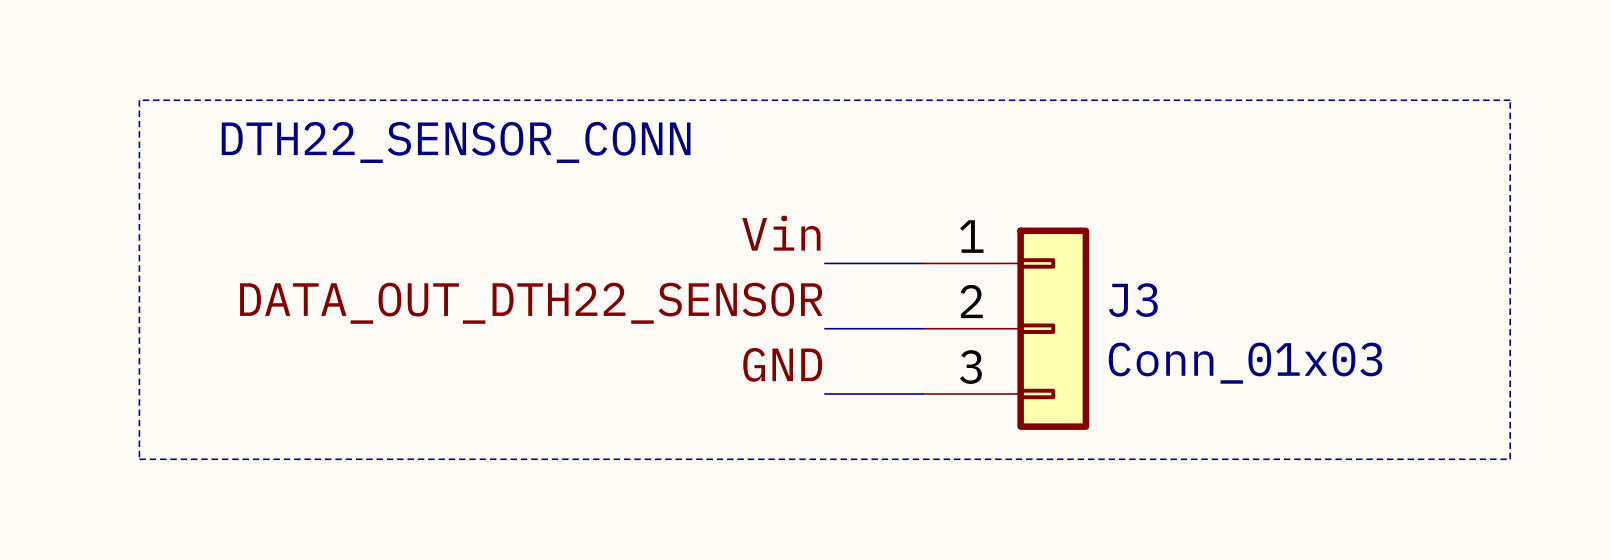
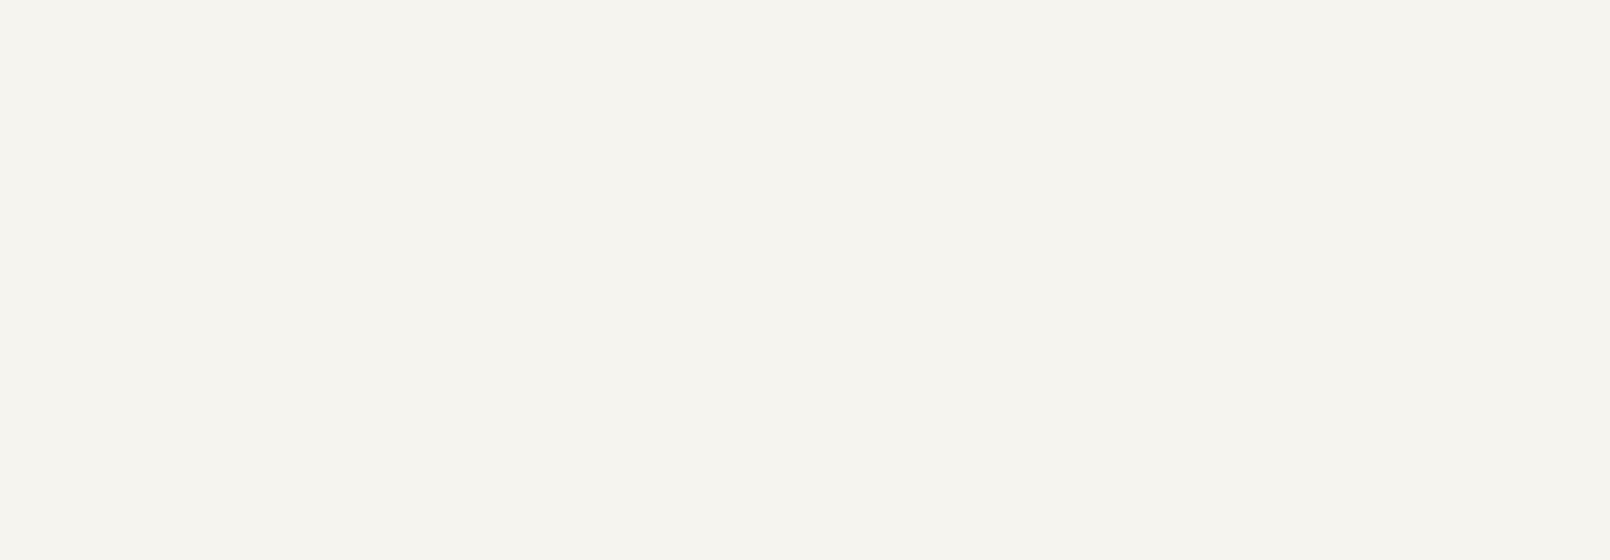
line: (139, 100) (139, 459) (1510, 459) (1510, 100) (139, 100) -> none
text: DTH22_SENSOR_CONN (456, 142) -> none
label: Vin (781, 233) -> none
wire: (824, 263) (922, 263) -> none
label: DATA_OUT_DTH22_SENSOR (531, 303) -> none
wire: (824, 328) (922, 328) -> none
J3: Conn_01x03 (1005, 328) -> none
label: GND (782, 364) -> none
wire: (824, 393) (922, 393) -> none

